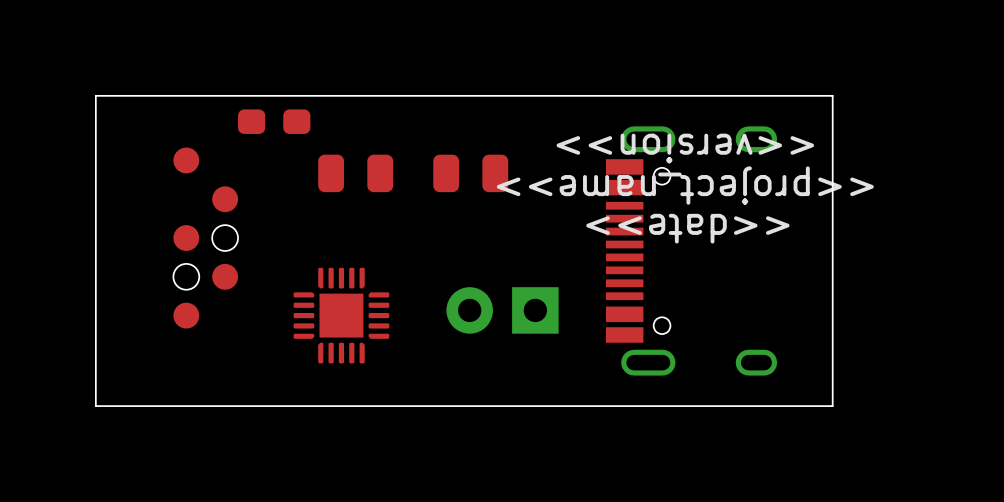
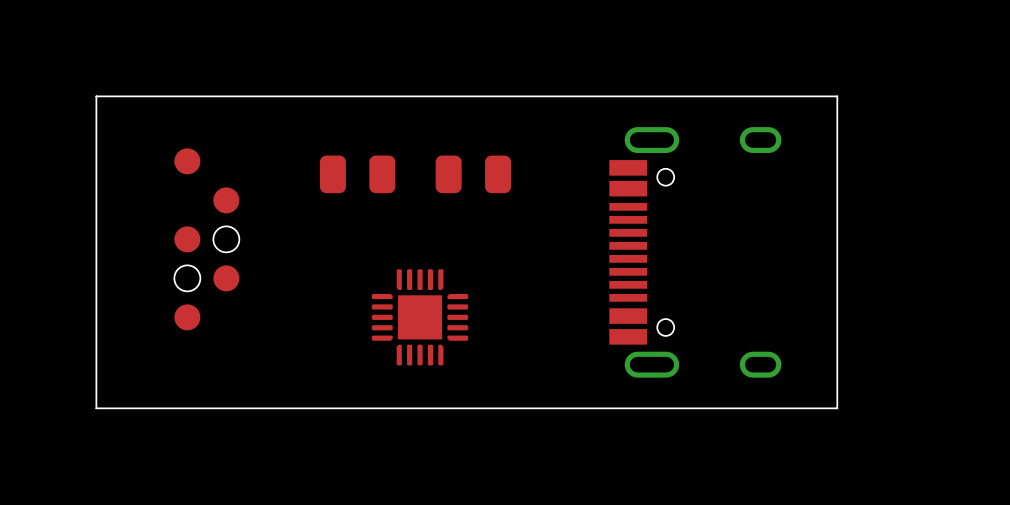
part: (274, 121) -> none
text: <<version>> (685, 148) -> none
text: <<project_name>> (685, 185) -> none
text: <<date>> (687, 228) -> none
part: (502, 310) -> none
part position: (341, 315) -> (420, 317)

